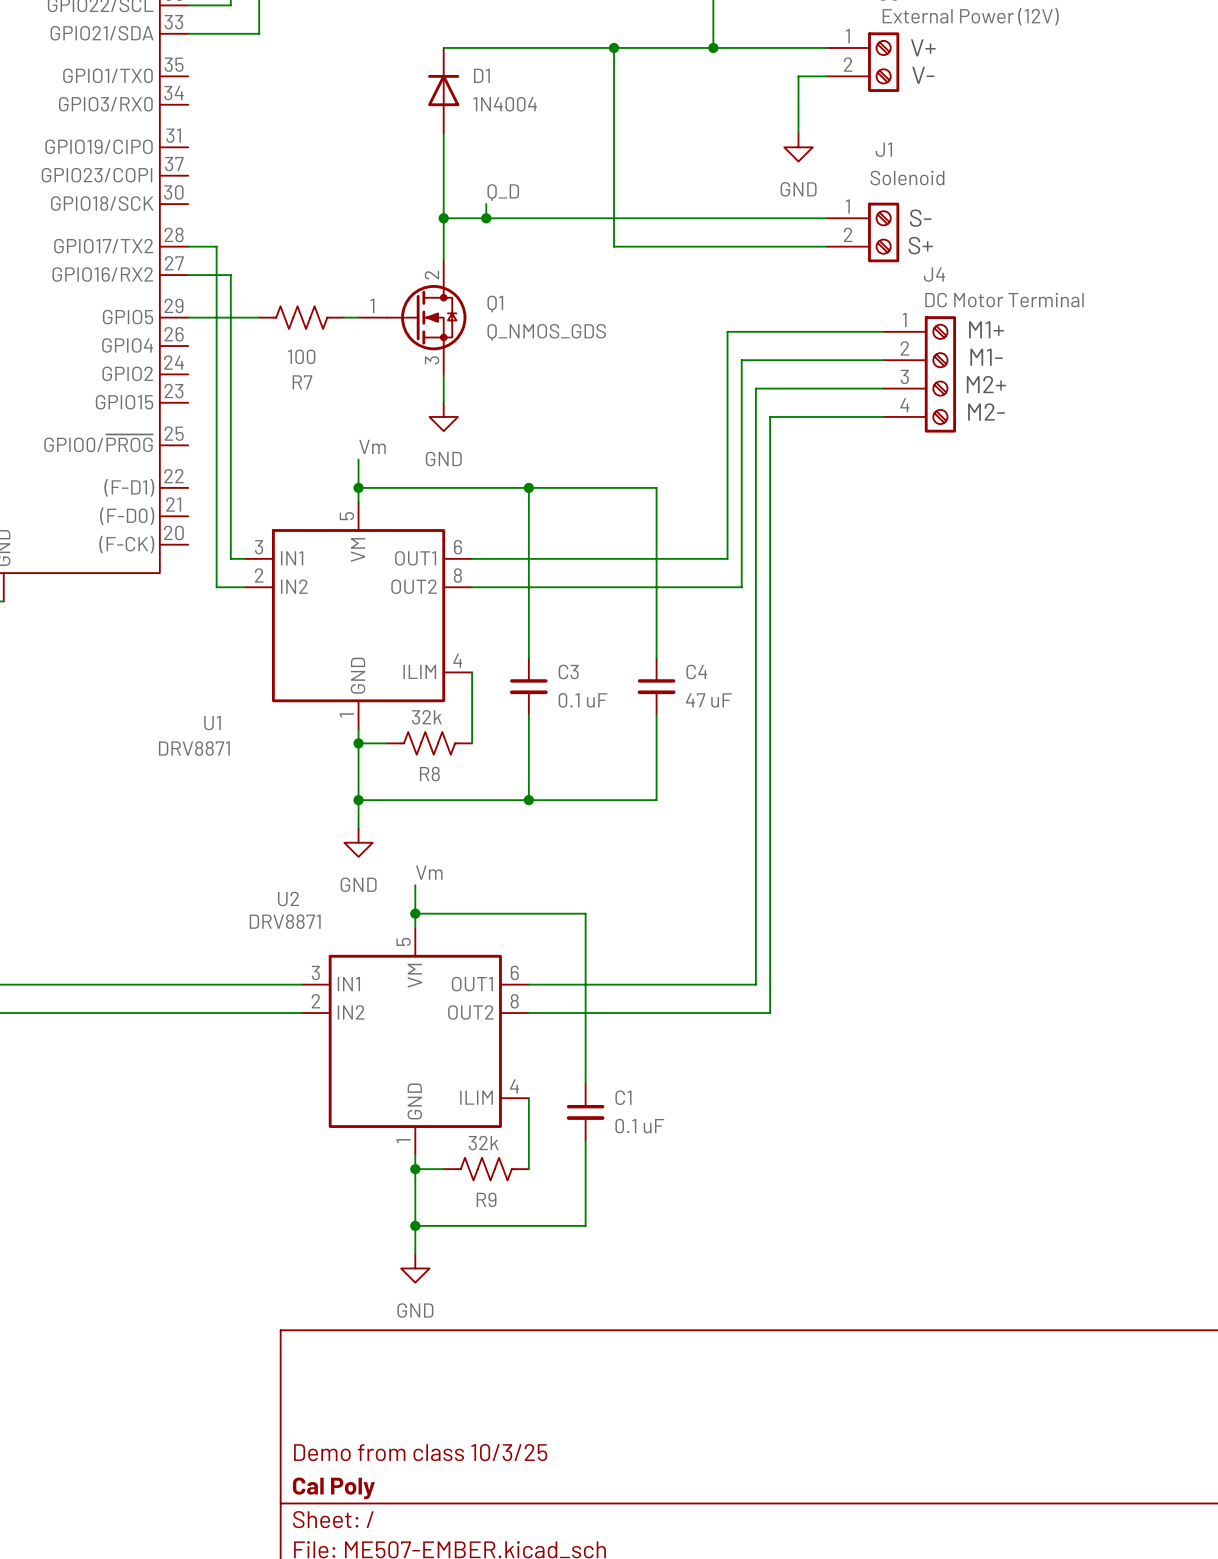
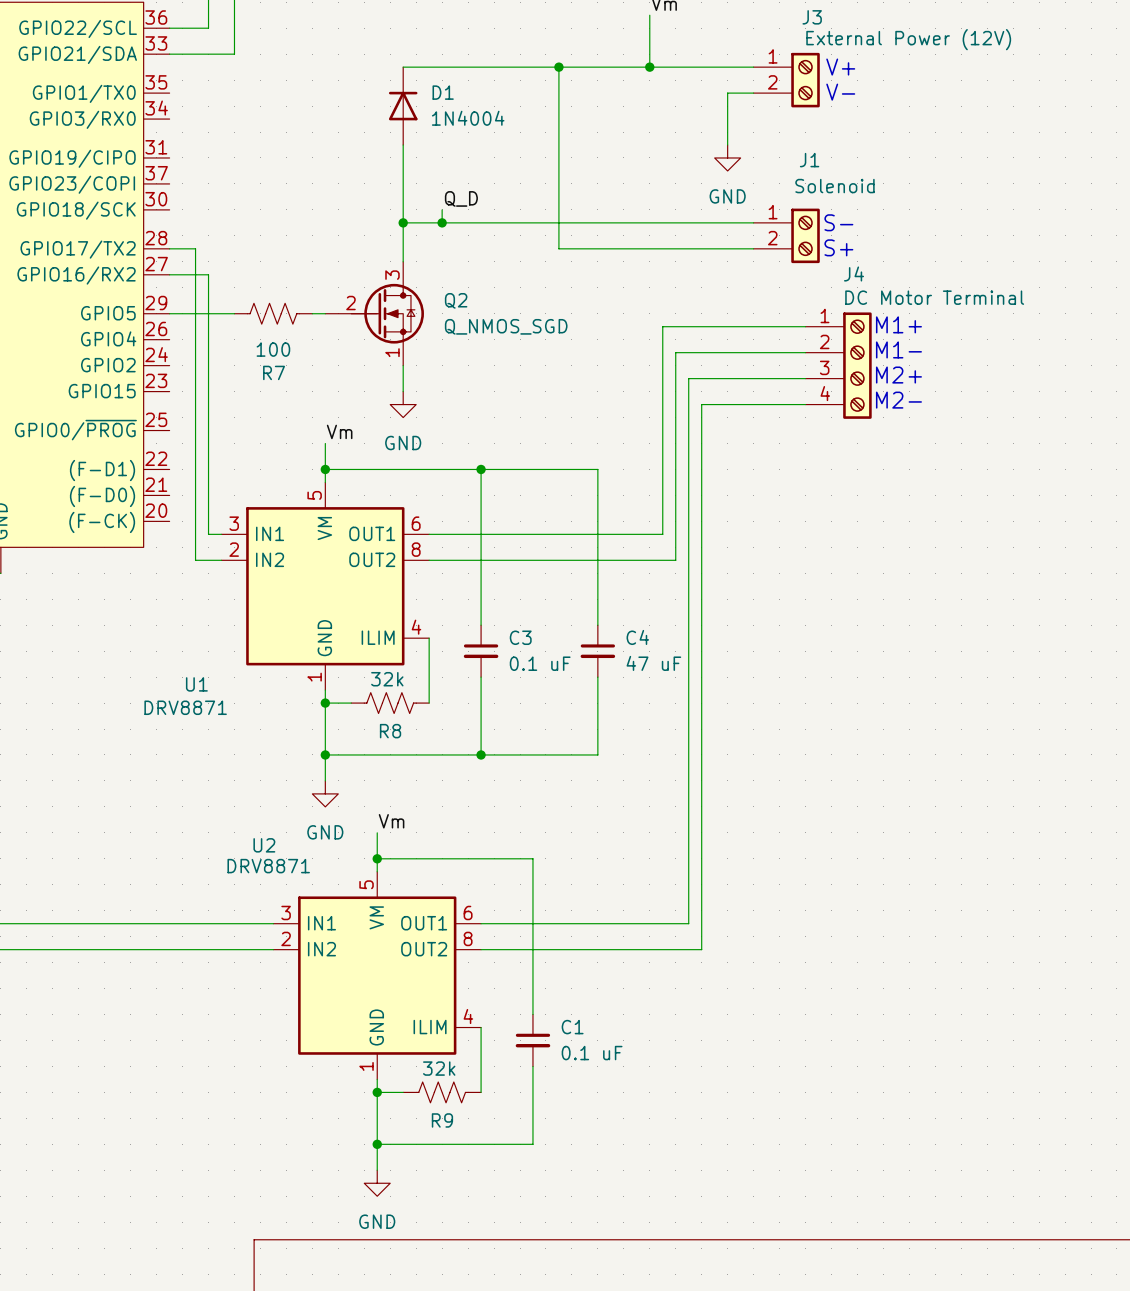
Q1: Q_NMOS_GDS (412, 317) -> none
Q2: none -> Q_NMOS_SGD (374, 313)

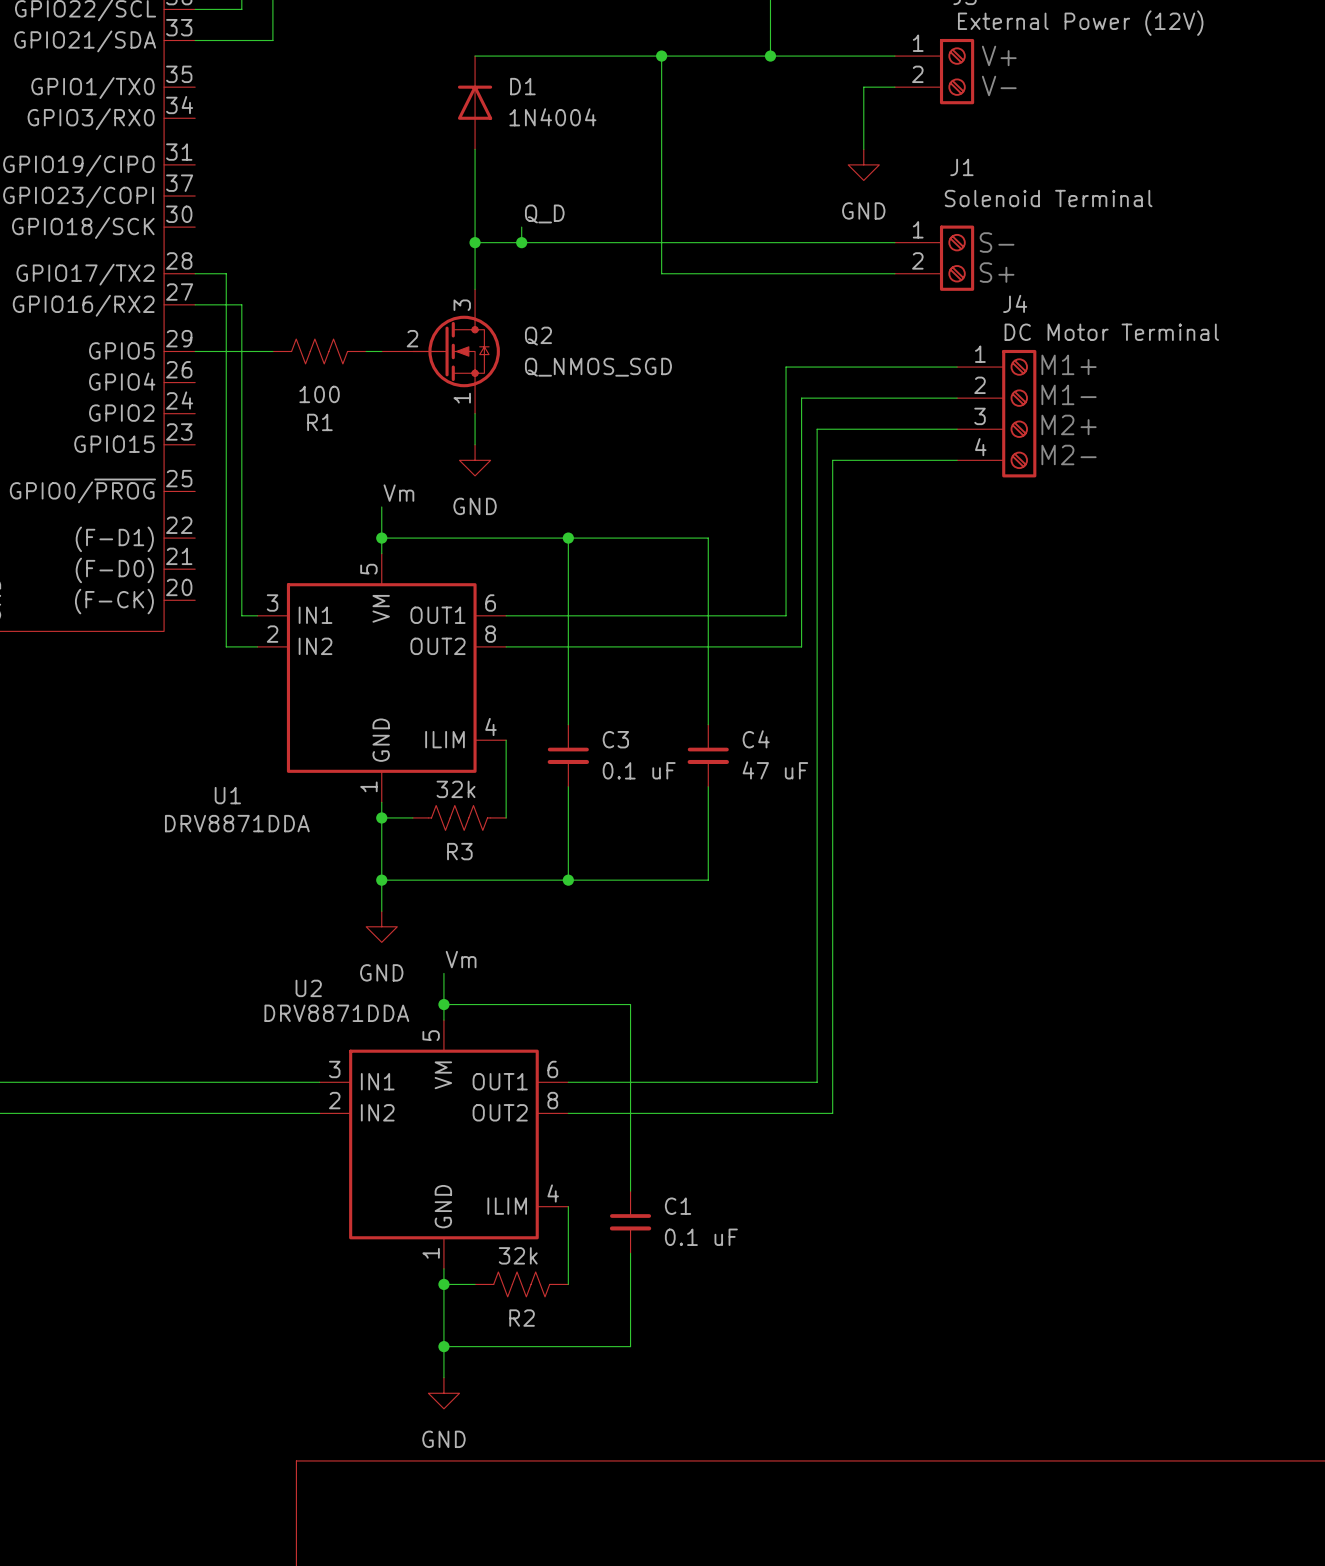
J1 value: Solenoid (834, 186) -> Solenoid Terminal (1048, 198)
R7 name: R7 (274, 372) -> R1 (319, 422)
U1 value: DRV8871 (185, 707) -> DRV8871DDA (237, 823)
R8 name: R8 (390, 731) -> R3 (459, 851)
U2 value: DRV8871 (268, 866) -> DRV8871DDA (336, 1013)
R9 name: R9 (442, 1120) -> R2 (522, 1318)

